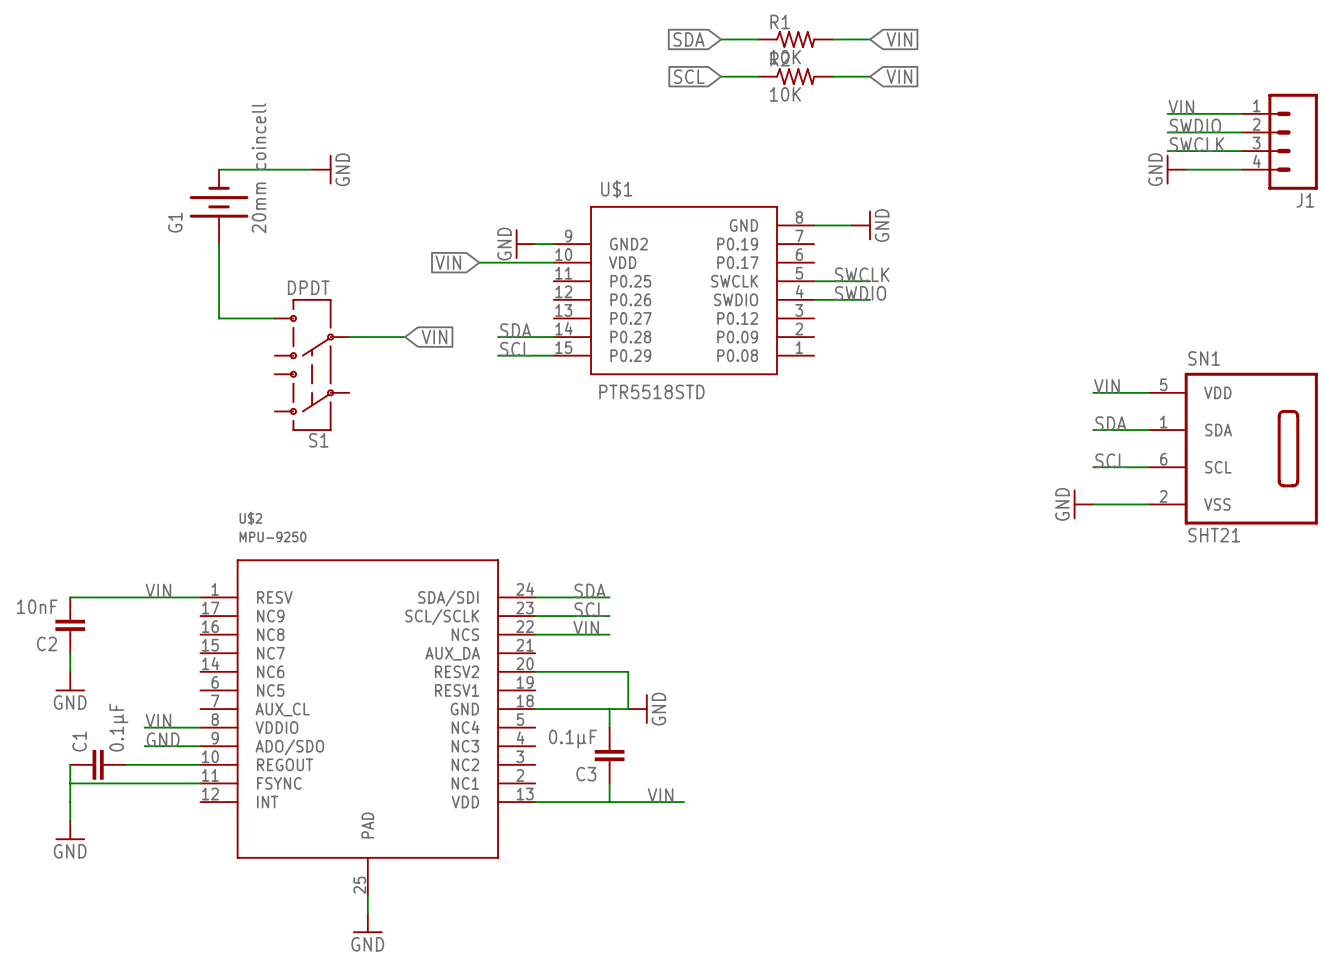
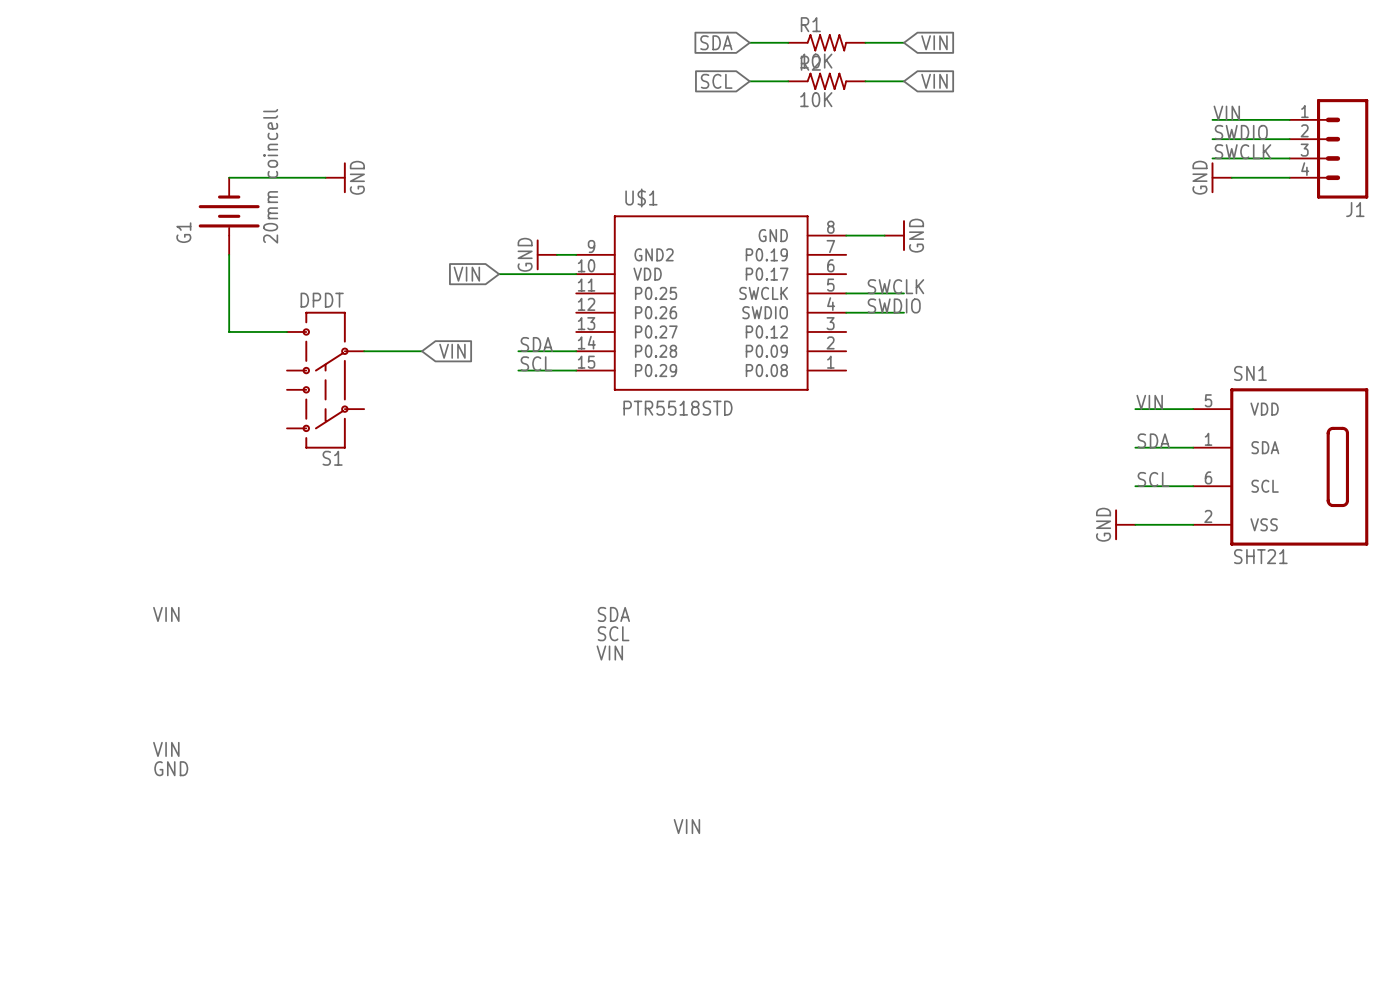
wire: (70, 597) (200, 597) -> none
wire: (535, 597) (609, 597) -> none
wire: (535, 616) (609, 616) -> none
C2: 10nF (70, 625) -> none
wire: (535, 634) (609, 634) -> none
wire: (70, 653) (70, 671) -> none
wire: (535, 671) (628, 671) (628, 709) (535, 709) -> none
power symbol: GND (70, 681) -> none
wire: (609, 709) (609, 727) -> none
power symbol: GND (637, 709) -> none
wire: (144, 727) (200, 727) -> none
U$2: MPU-9250 (367, 727) -> none
wire: (144, 746) (200, 746) -> none
C3: 0.1µF (609, 755) -> none
wire: (70, 764) (70, 820) -> none
C1: 0.1µF (98, 764) -> none
wire: (126, 764) (200, 764) -> none
wire: (70, 783) (200, 783) -> none
wire: (609, 783) (609, 802) -> none
wire: (535, 802) (684, 802) -> none
power symbol: GND (70, 830) -> none
wire: (367, 895) (367, 913) -> none
power symbol: GND (367, 923) -> none

